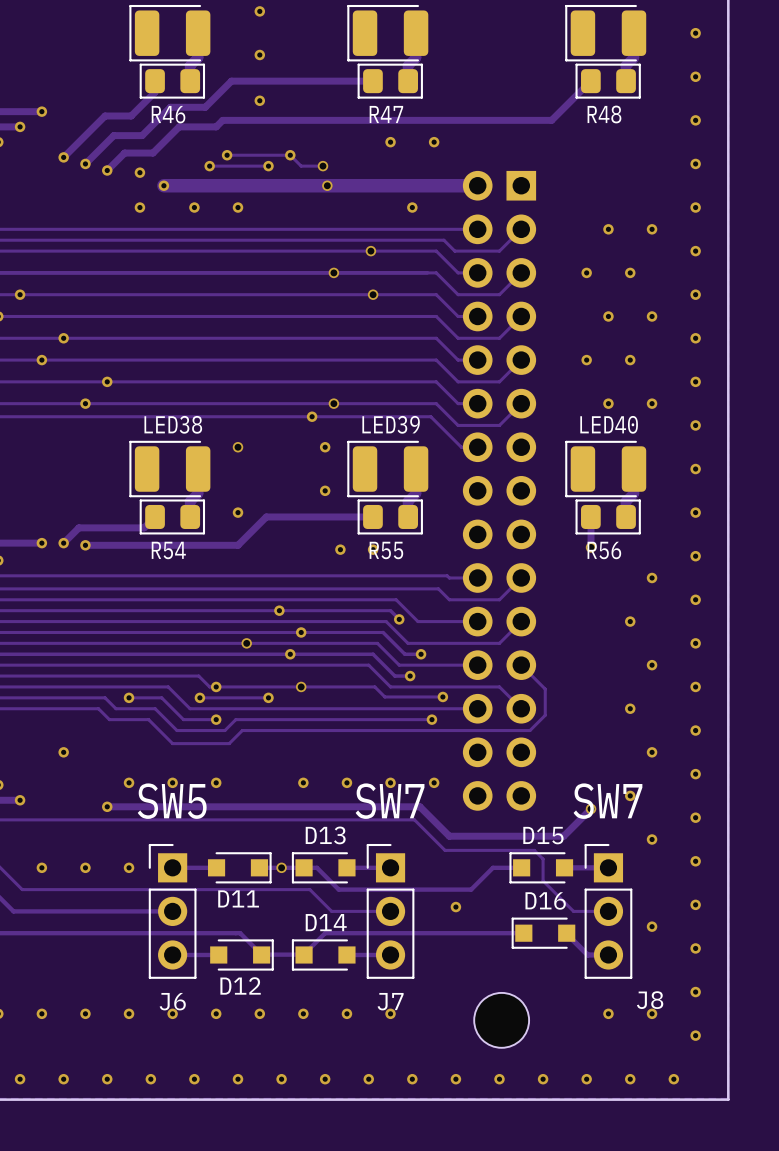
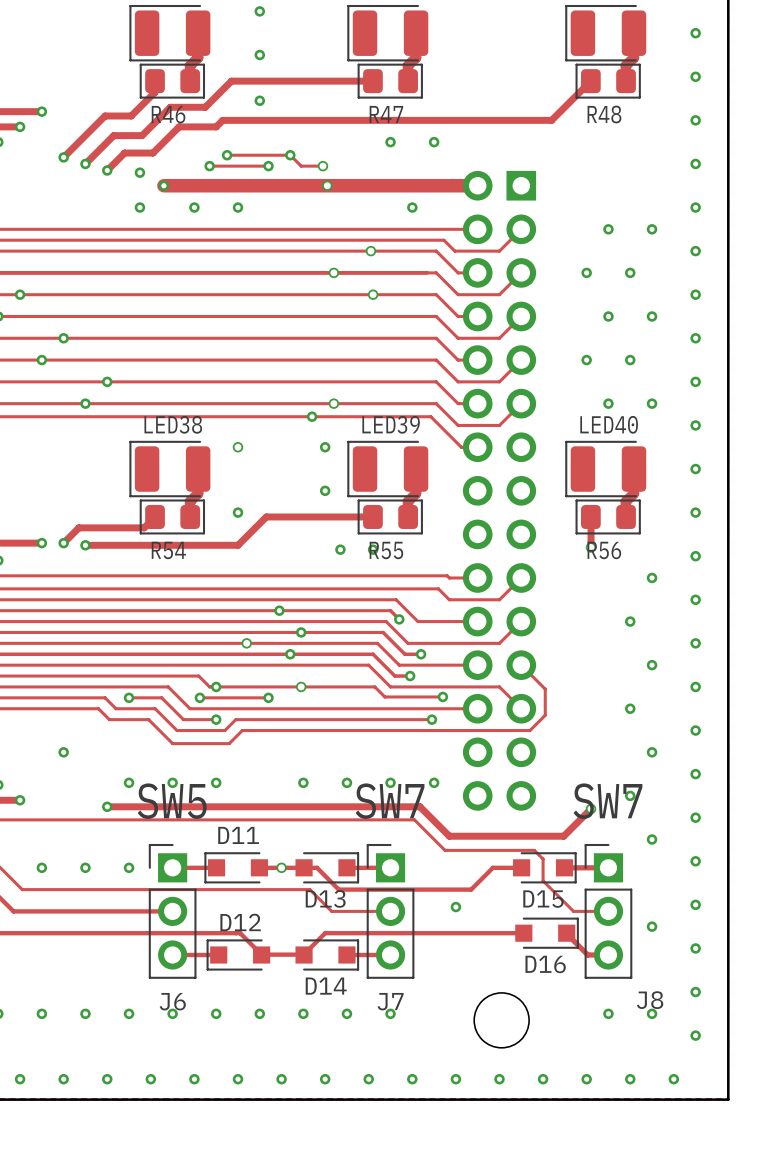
D11 rotation: 0° (239, 867) -> 180° (236, 867)
D13 rotation: 0° (323, 867) -> 180° (327, 867)
D15 rotation: 0° (541, 867) -> 180° (544, 867)
D16 rotation: 0° (543, 933) -> 180° (547, 933)
D12 rotation: 0° (241, 954) -> 180° (238, 954)
D14 rotation: 0° (323, 954) -> 180° (327, 954)

